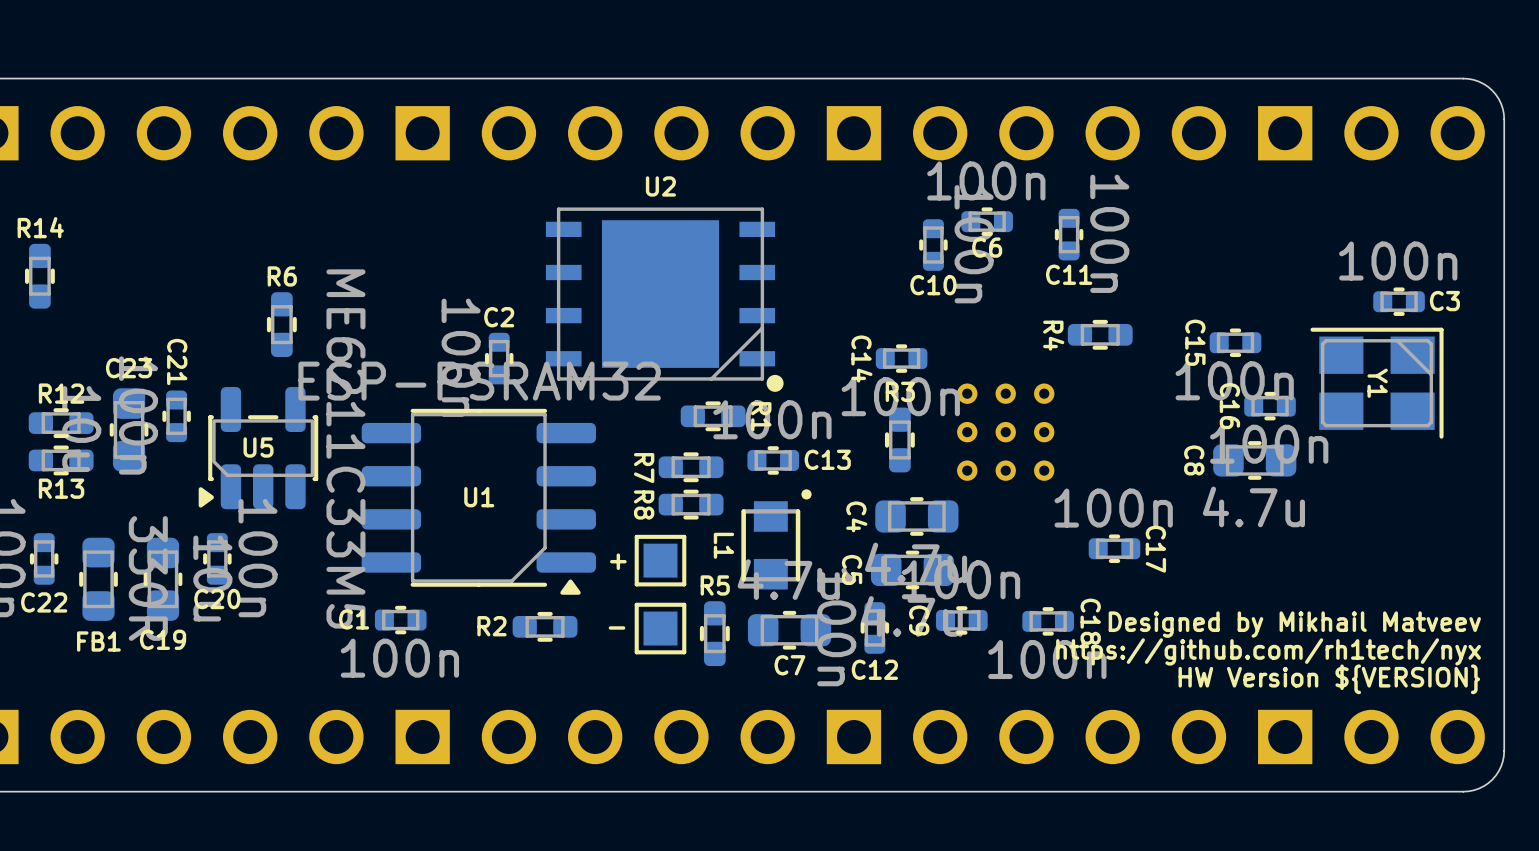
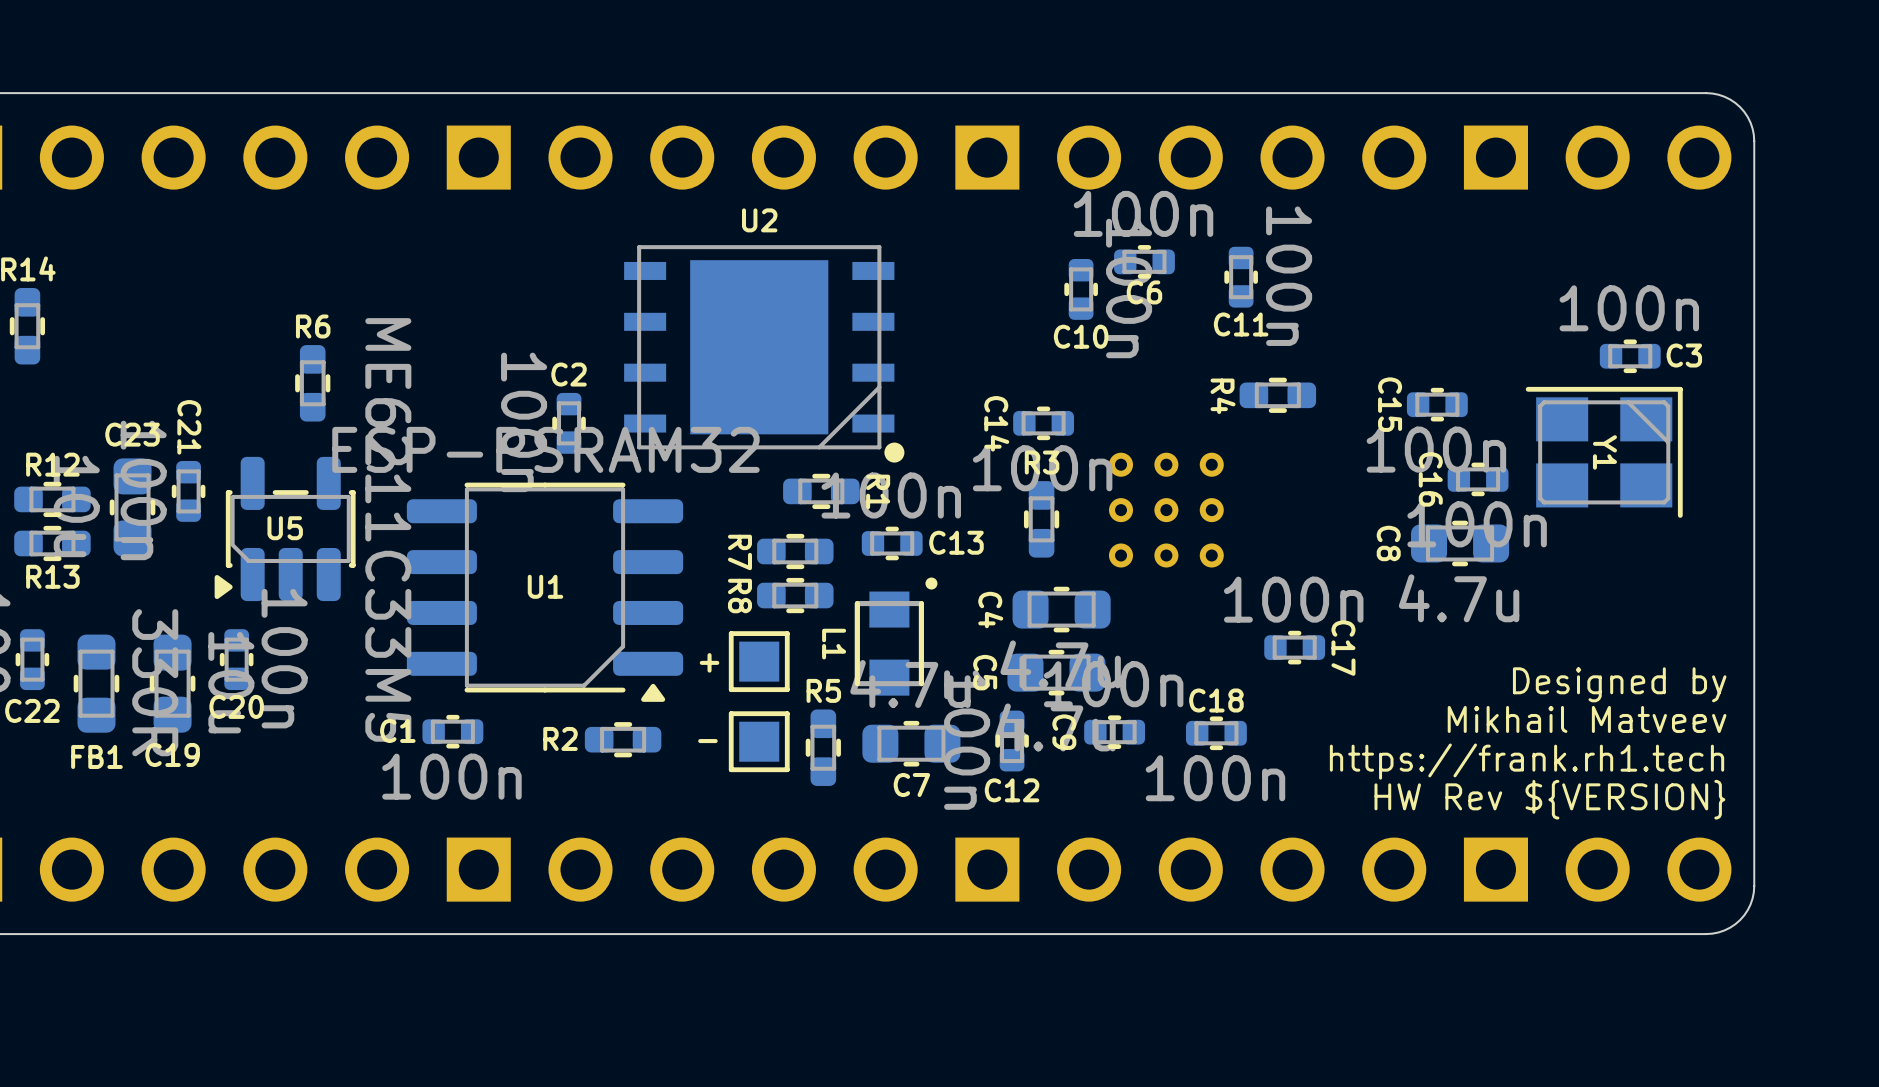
text: none -> Designed by (1619, 684)
C18 name rotation: 0° (1090, 621) -> 90° counterclockwise (1216, 700)
text: Designed by Mikhail Matveev (1294, 624) -> Mikhail Matveev (1587, 719)
text: https://github.com/rh1tech/nyx (1268, 651) -> https://frank.rh1.tech (1527, 761)
text: HW Version ${VERSION} (1329, 679) -> HW Rev ${VERSION} (1549, 799)

